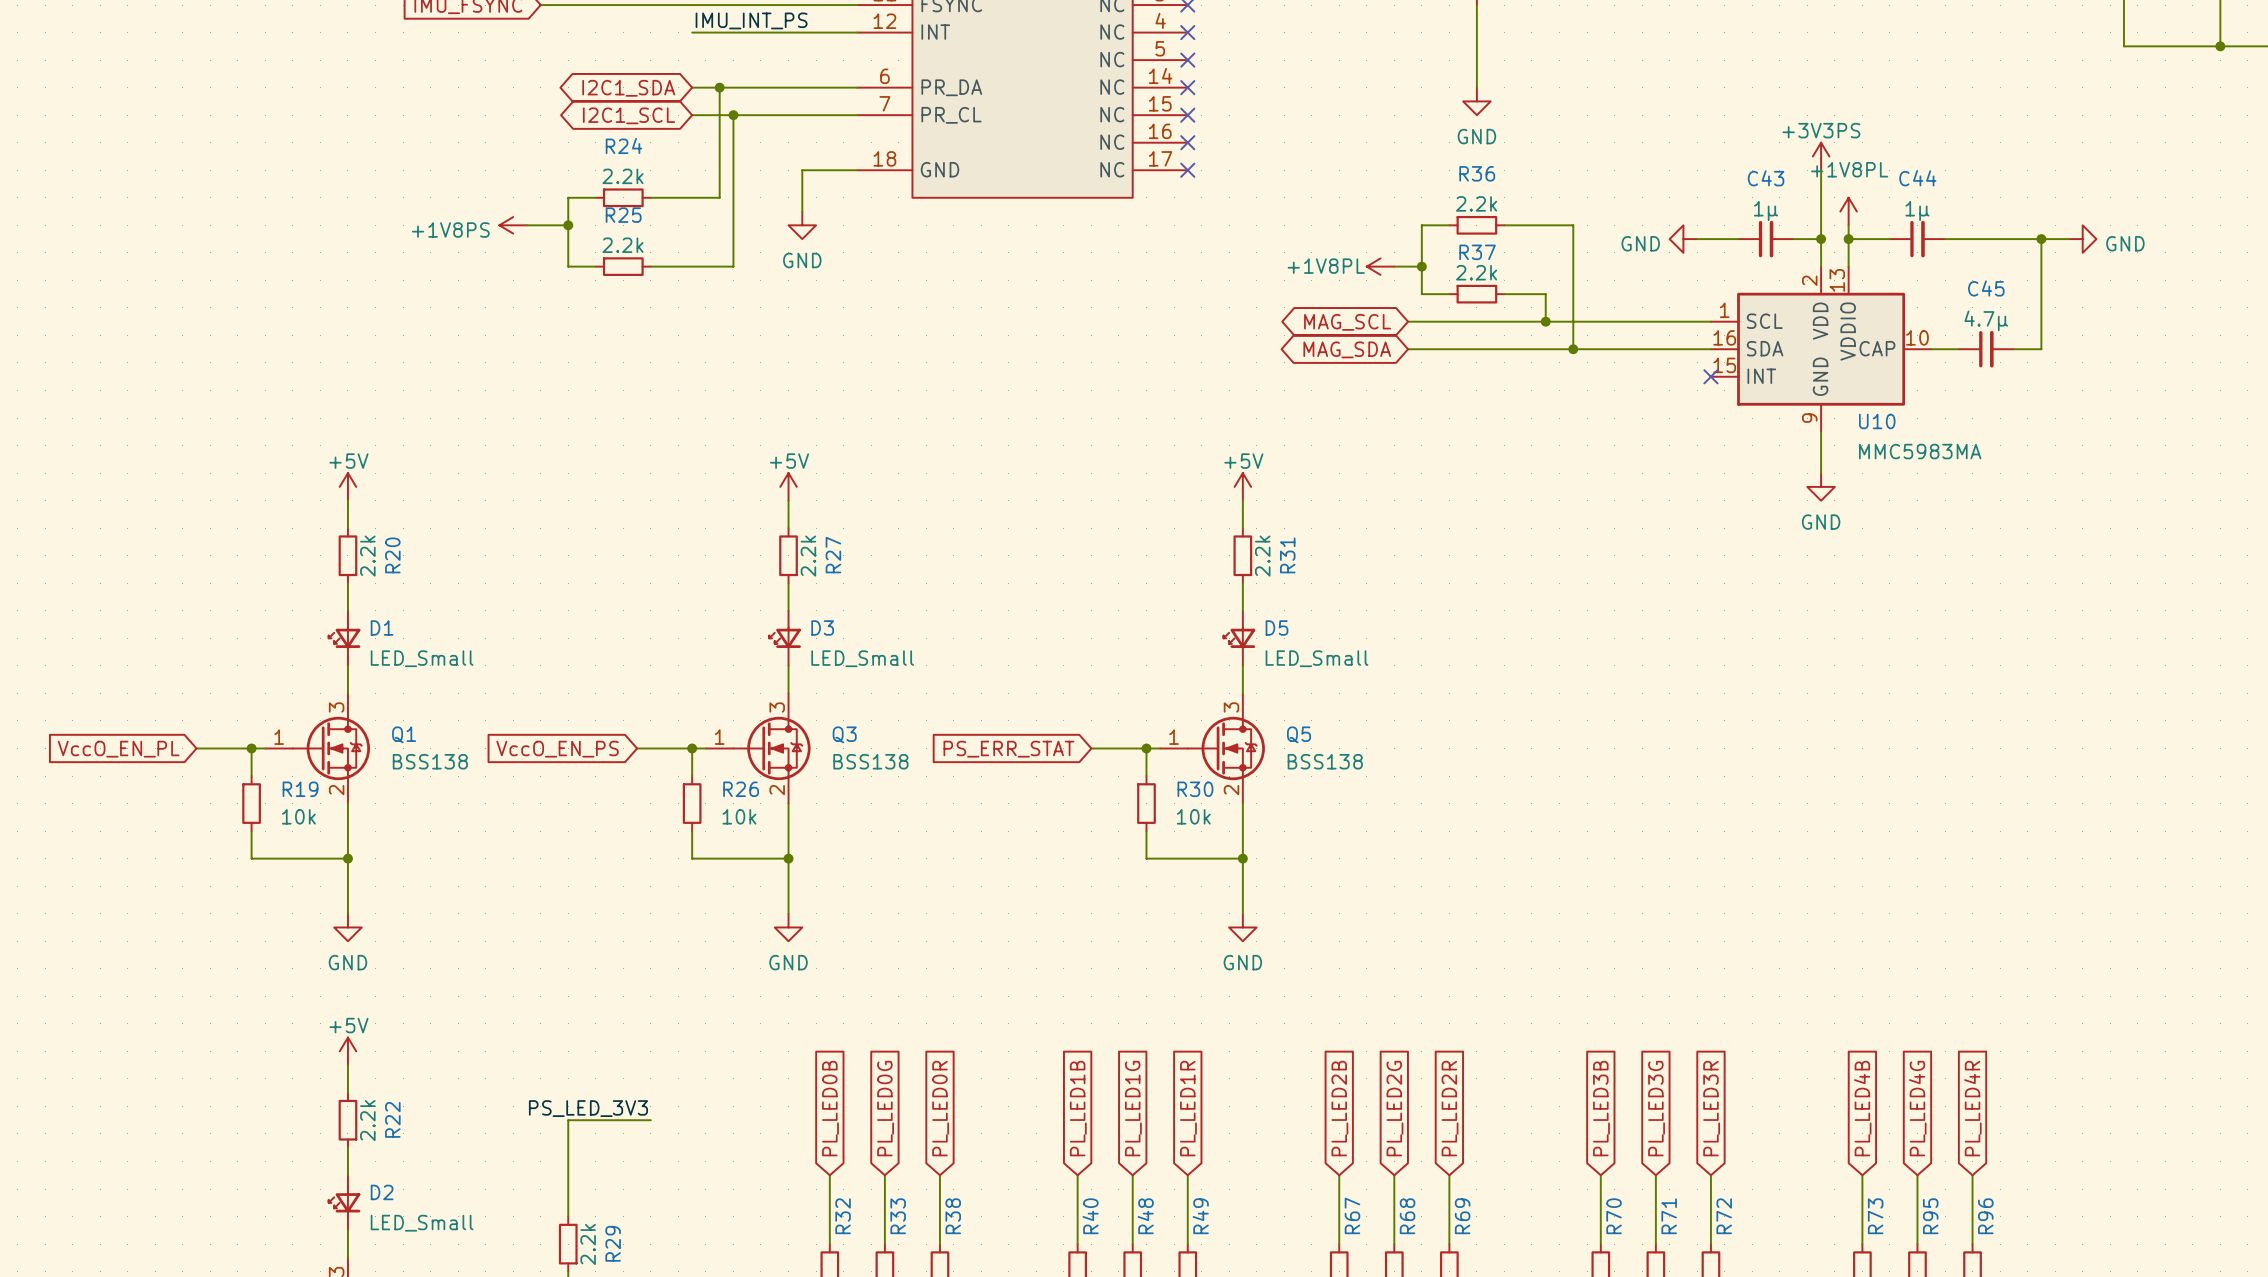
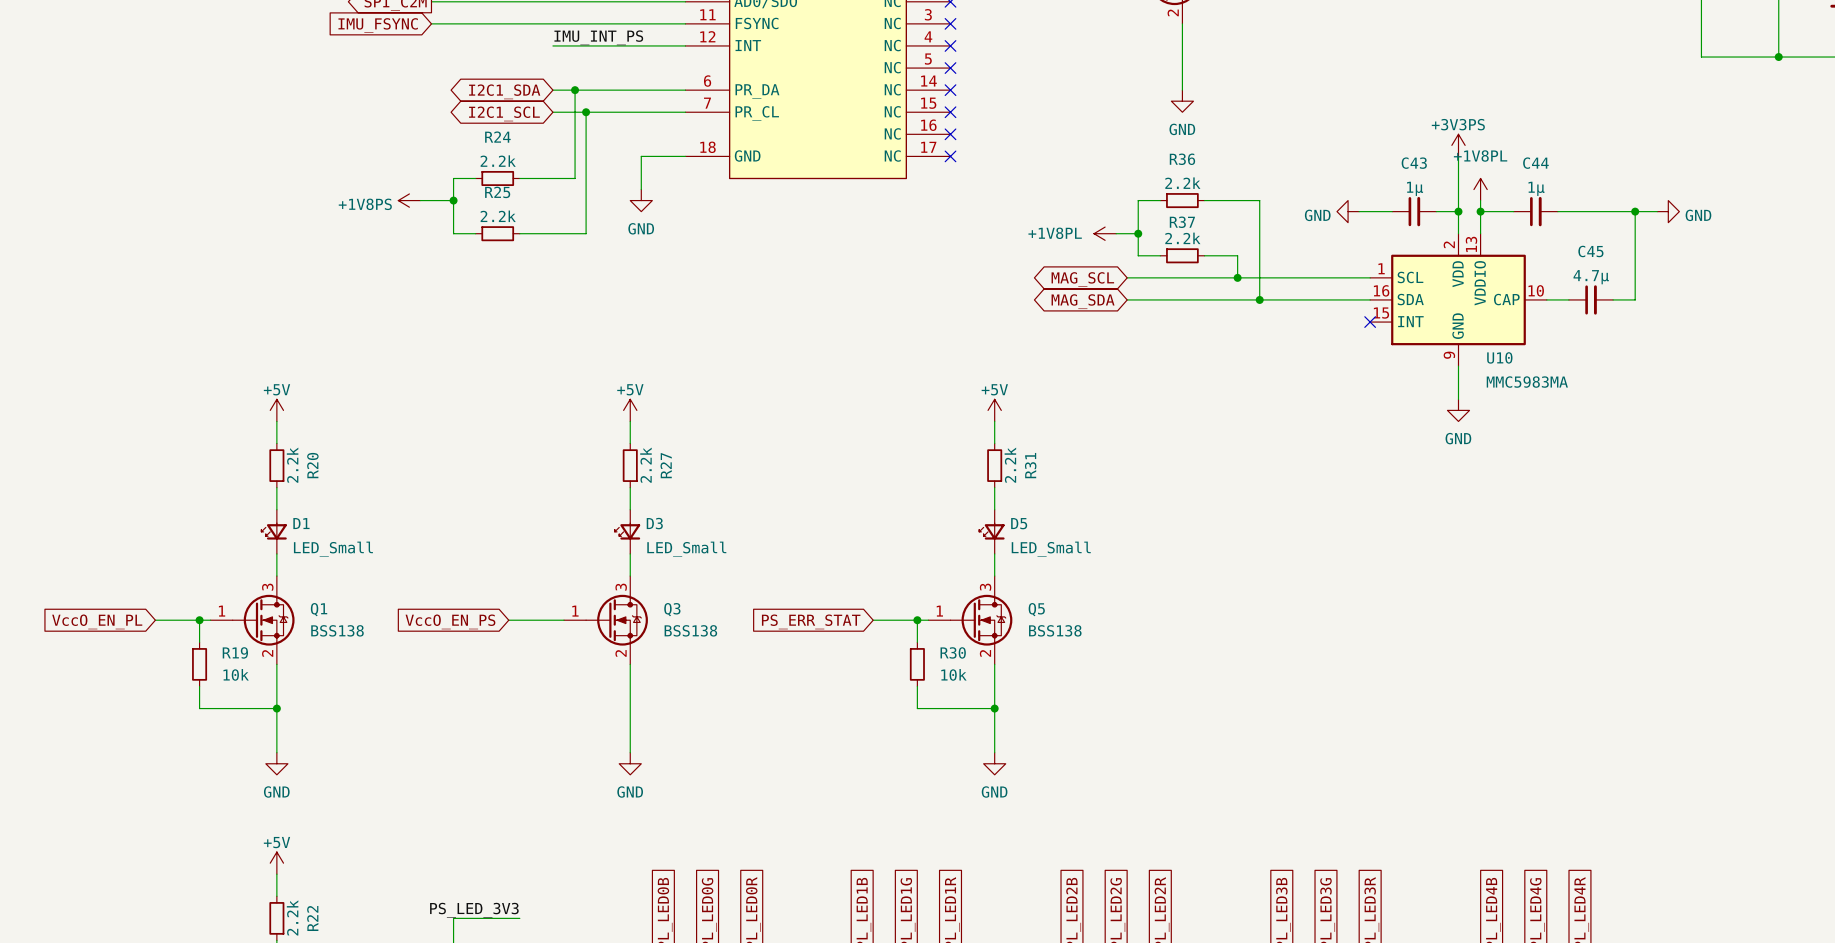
wire: (692, 748) (692, 776) -> none
junction: (692, 748) -> none
R26: 10k (692, 803) -> none
wire: (692, 831) (692, 858) (788, 858) -> none
junction: (788, 858) -> none

